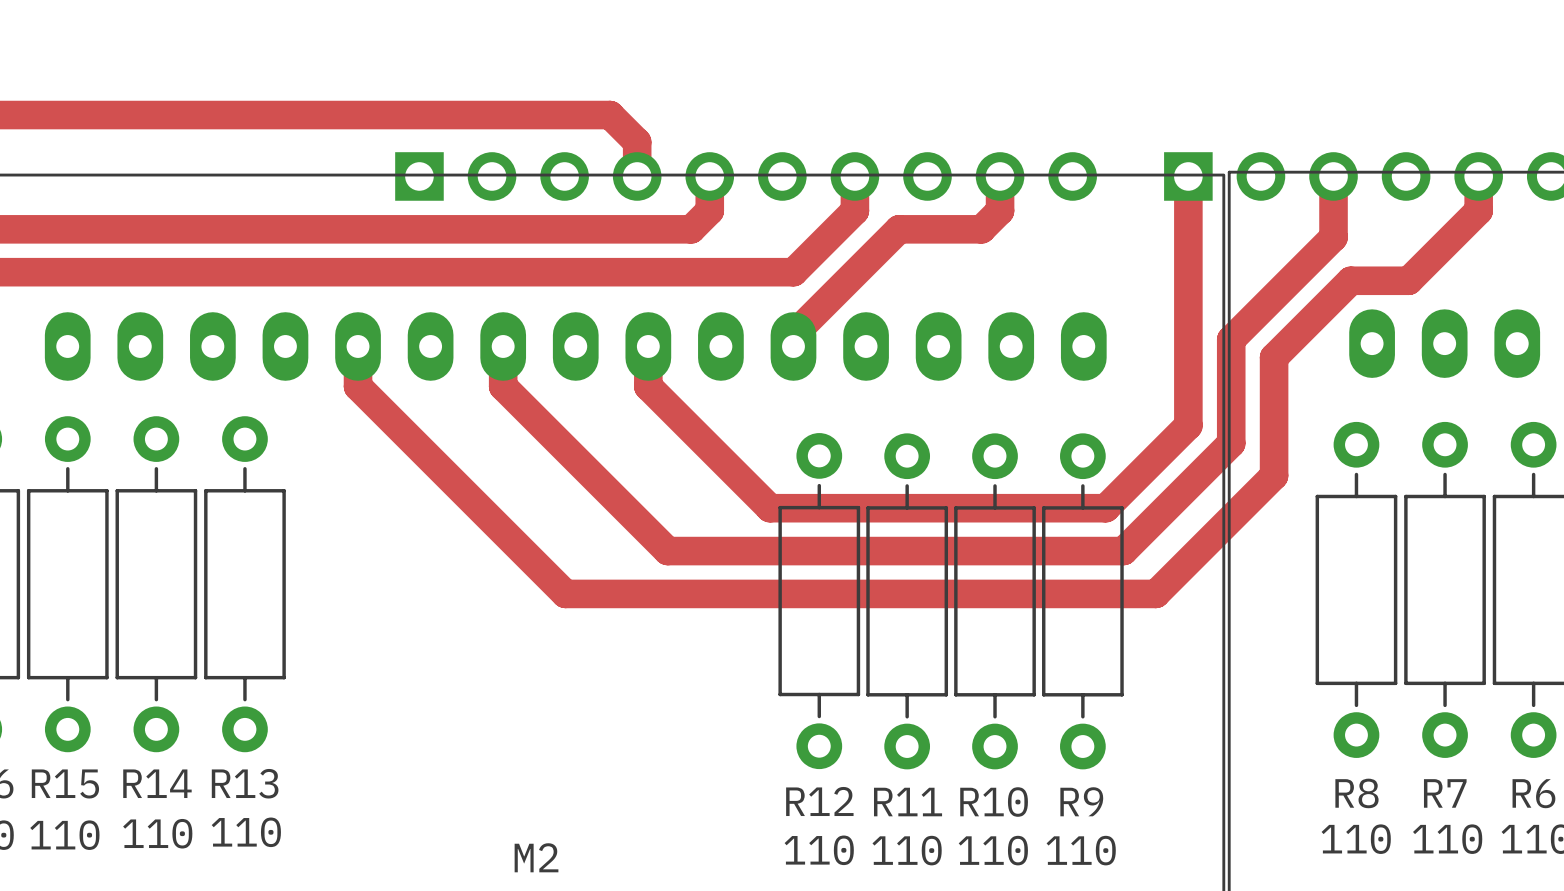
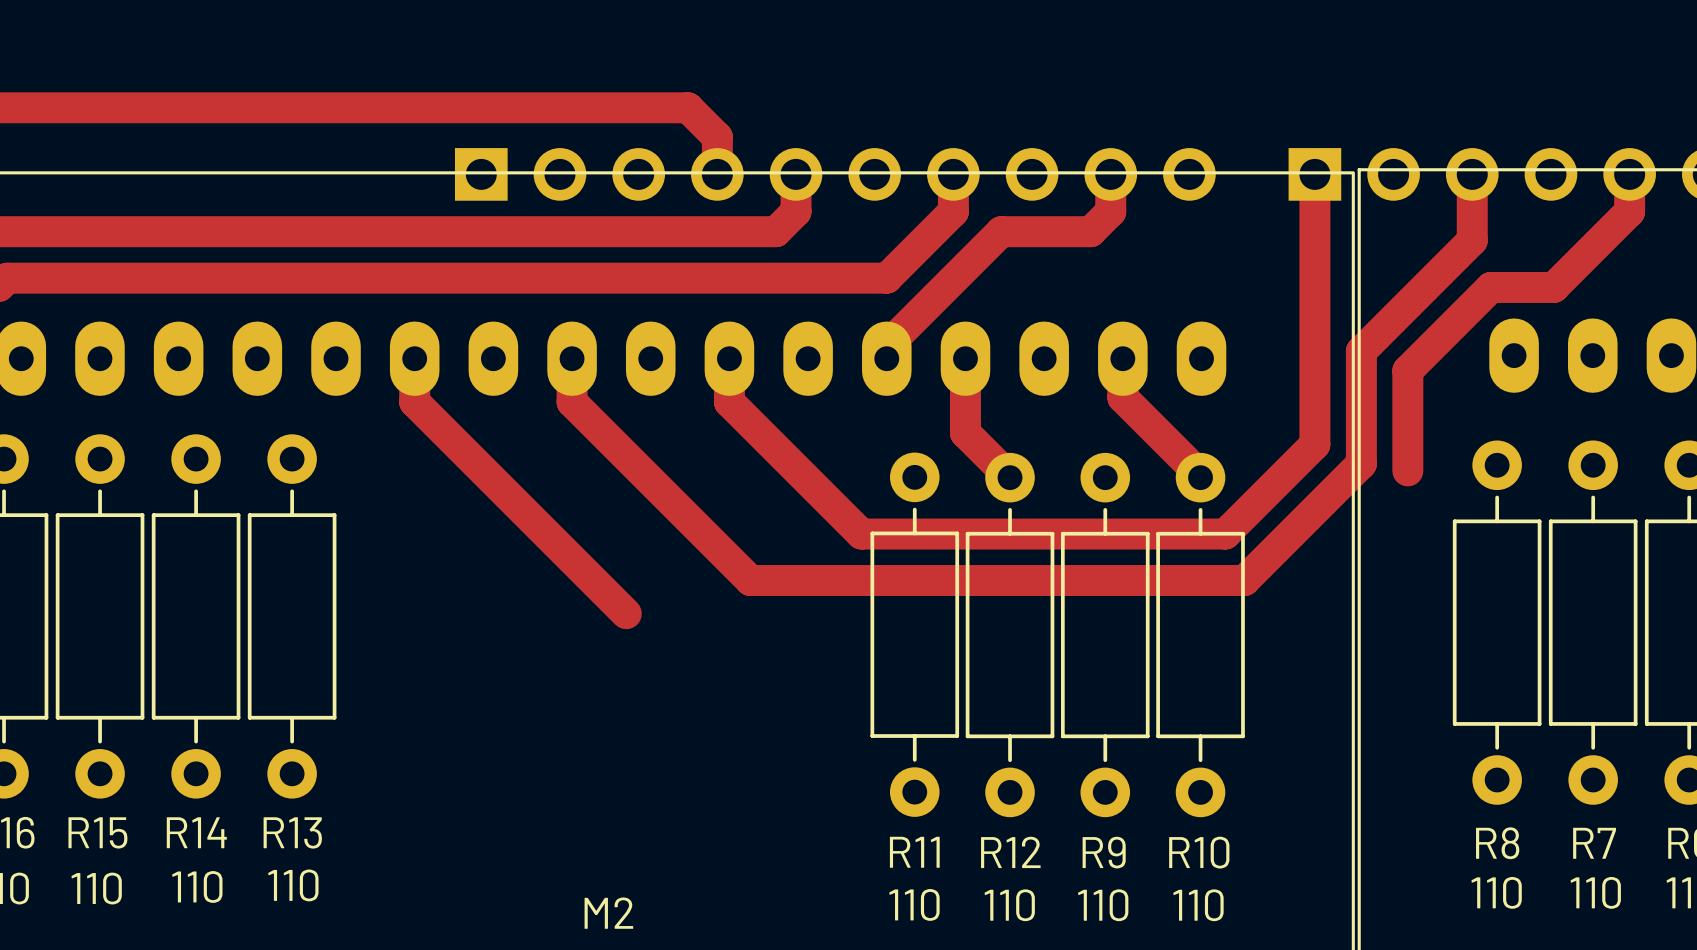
track: none -> (965, 358) (965, 432) (1010, 478)
track: none -> (1122, 358) (1122, 397) (1202, 477)
track: (1274, 450) (1274, 475) (1155, 593) (565, 593) (553, 581) -> none
R12 name: R12 (819, 801) -> R11 (914, 852)
R9 name: R9 (1081, 801) -> R10 (1199, 852)
R11 name: R11 (908, 802) -> R12 (1010, 852)
R10 name: R10 (994, 802) -> R9 (1104, 852)

